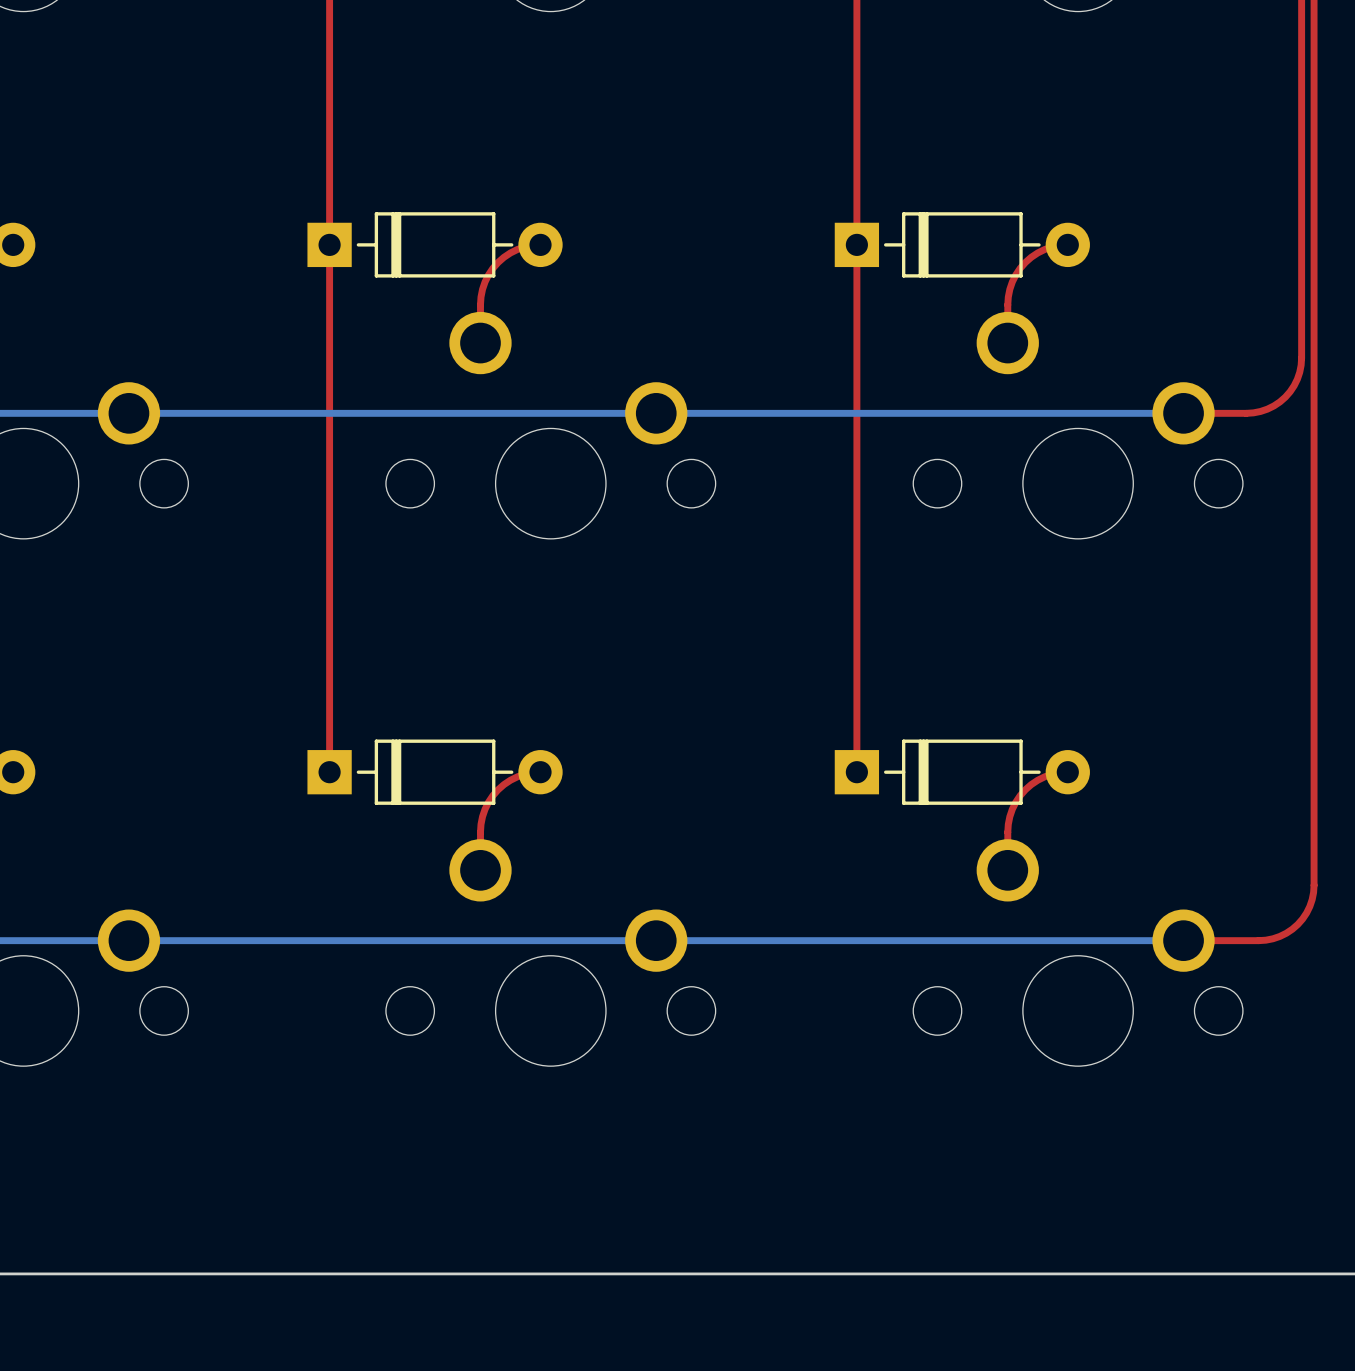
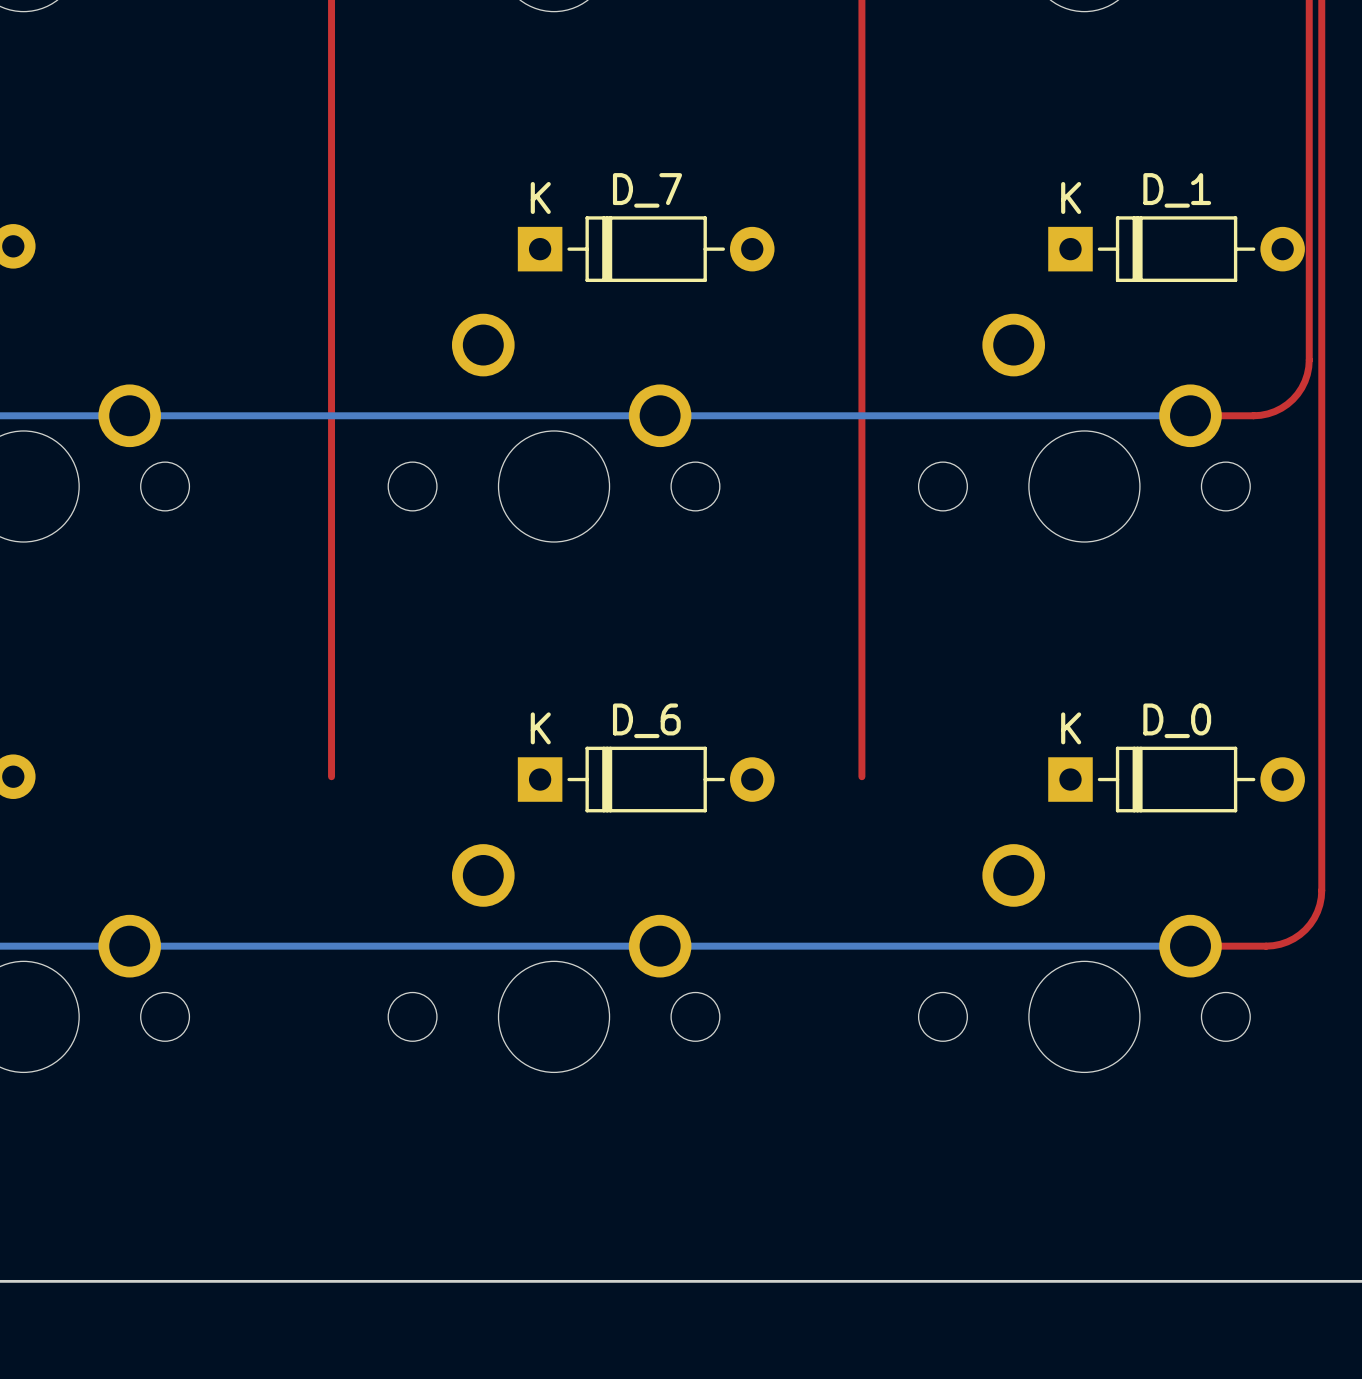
part: (435, 244) -> none
top track: (540, 244) (524, 246) (510, 252) (498, 262) (488, 274) (481, 297) (480, 343) -> none
part: (962, 244) -> none
top track: (1067, 244) (1052, 246) (1037, 252) (1025, 262) (1015, 274) (1008, 297) (1007, 343) -> none
D_7: none -> (646, 249)
D_1: none -> (1176, 249)
part: (435, 772) -> none
top track: (540, 772) (524, 774) (510, 780) (498, 789) (488, 802) (481, 824) (480, 870) -> none
part: (962, 772) -> none
top track: (1067, 772) (1052, 774) (1037, 780) (1025, 789) (1015, 802) (1008, 824) (1007, 870) -> none
D_6: none -> (646, 779)
D_0: none -> (1176, 779)

